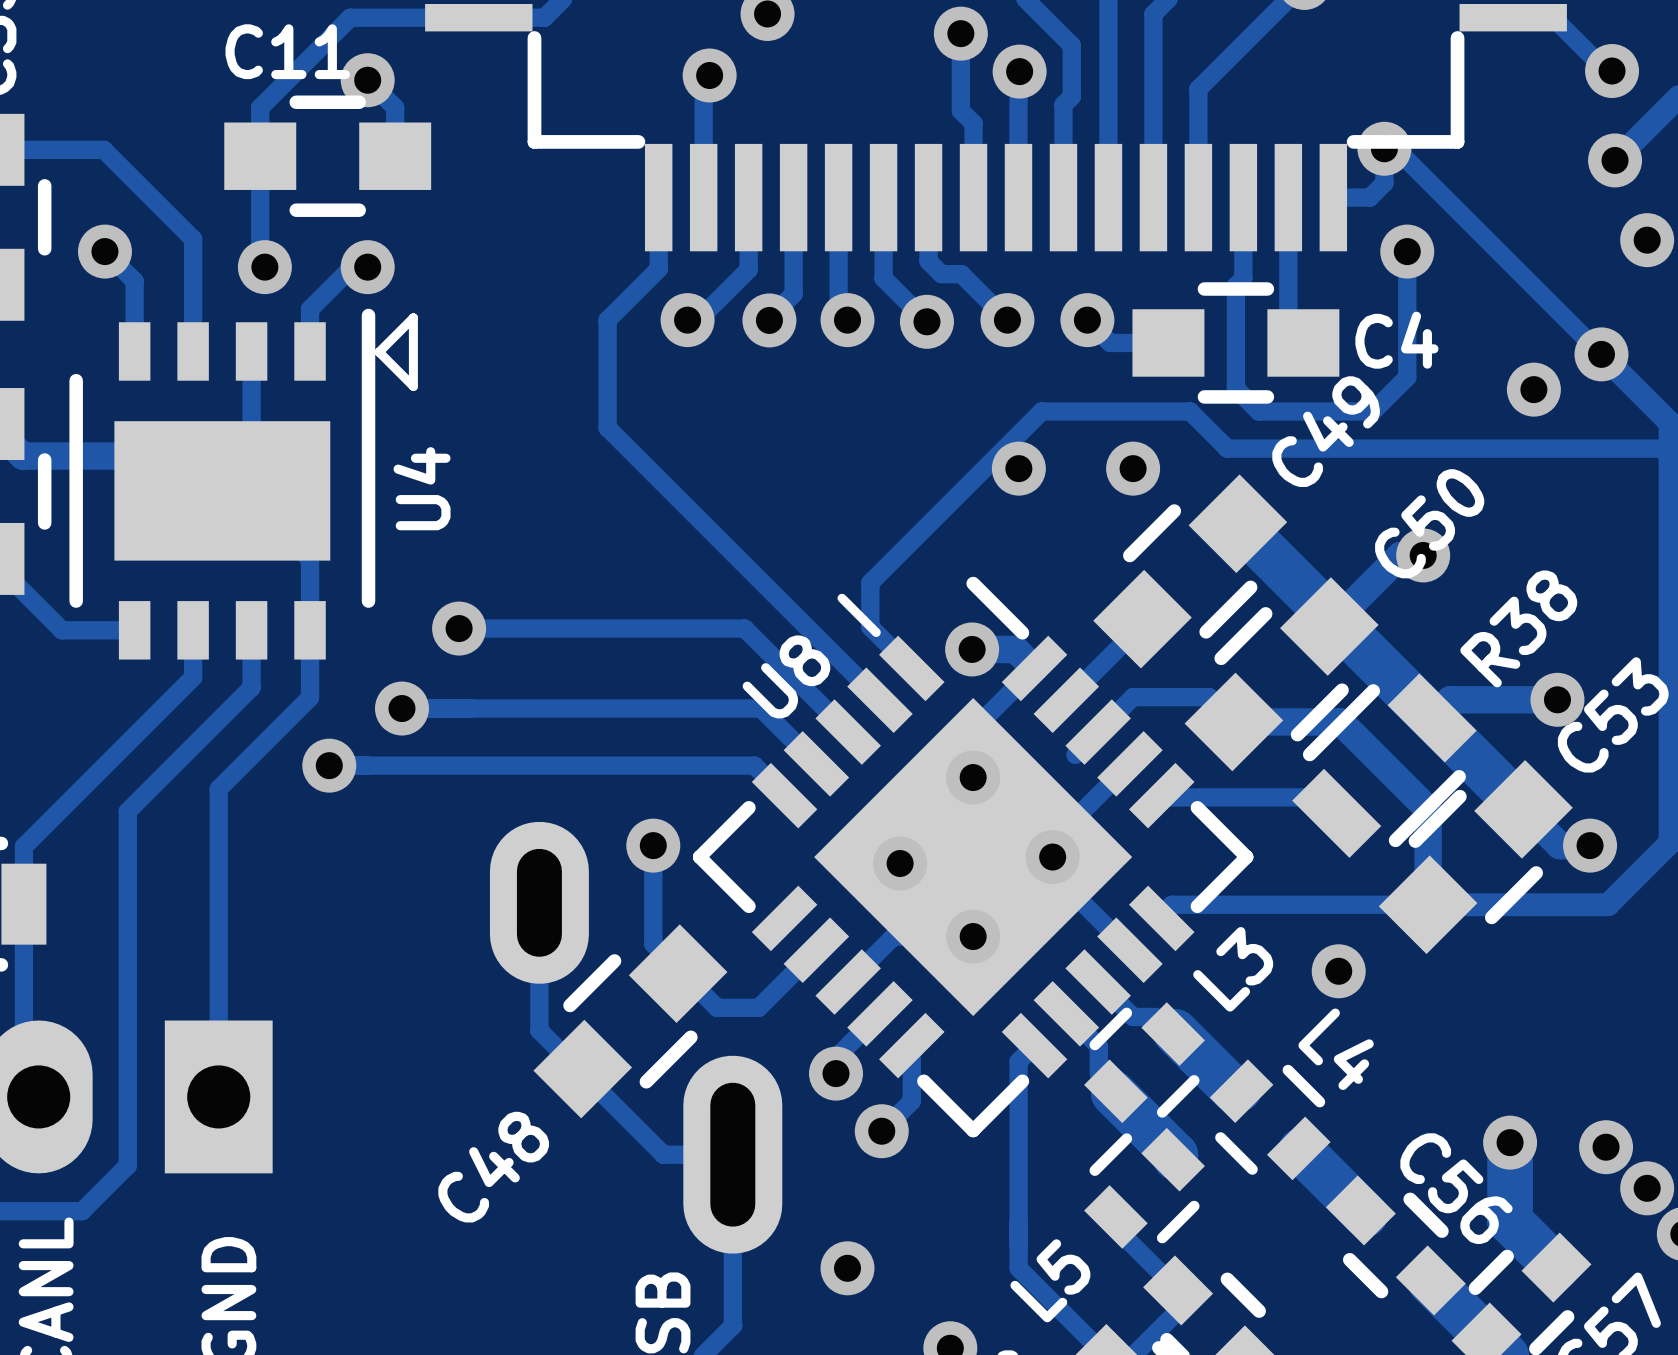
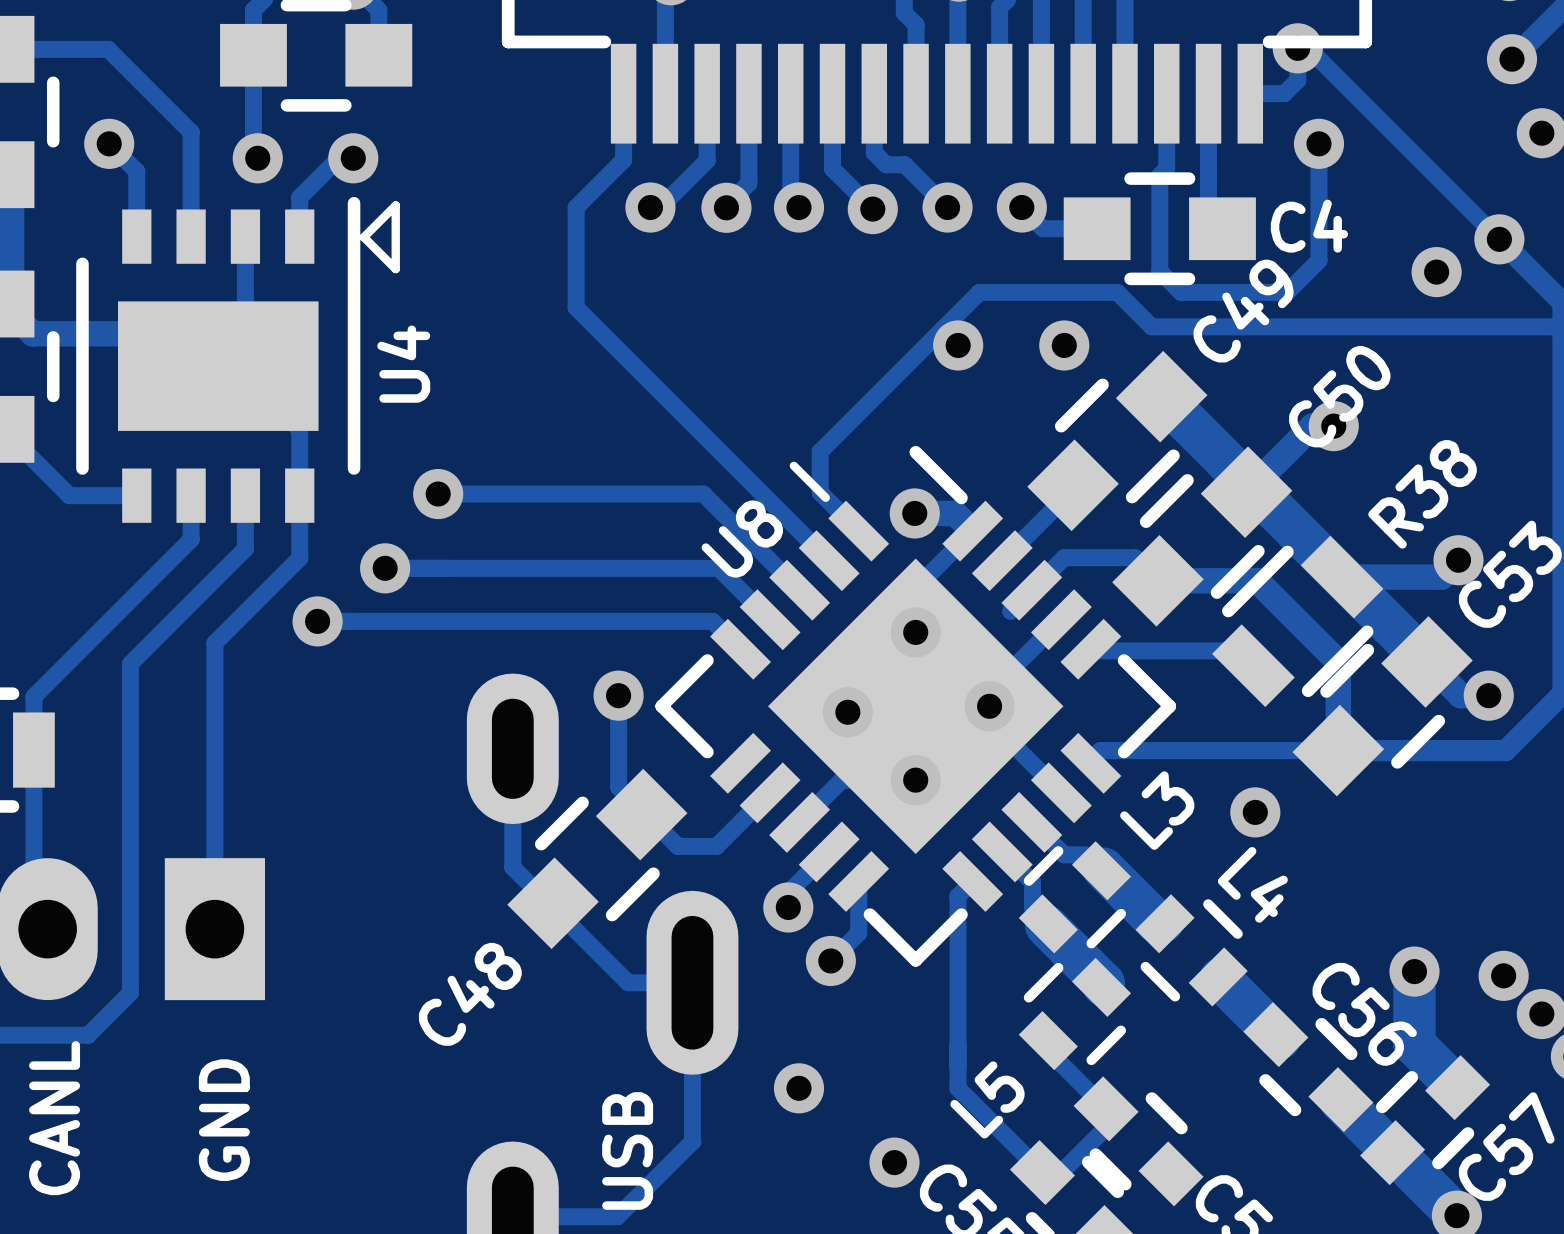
track: (1557, 699) (1450, 699) (1432, 717) -> (1458, 560) (1441, 577) (1342, 577)

